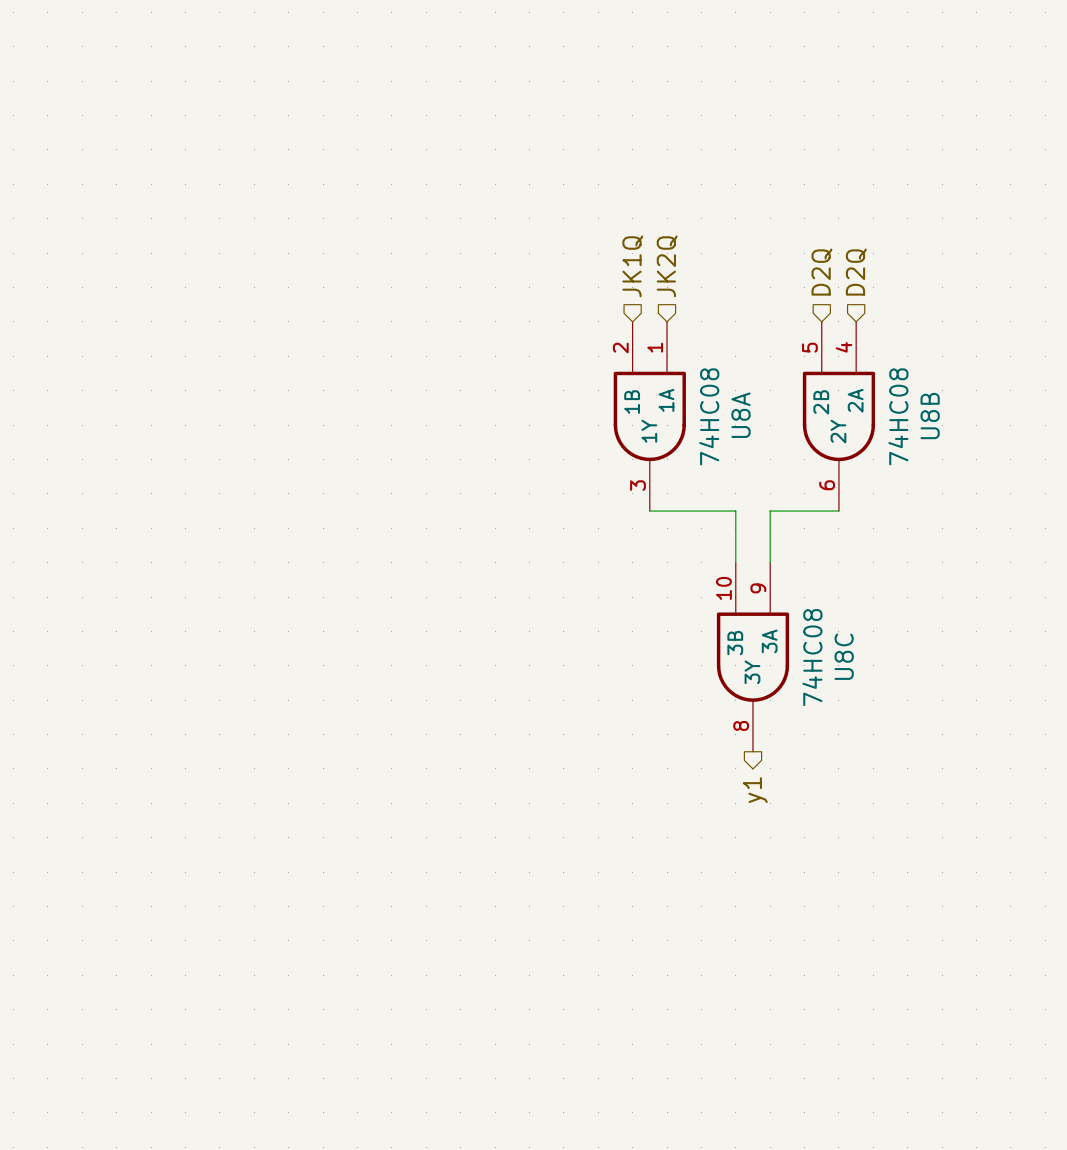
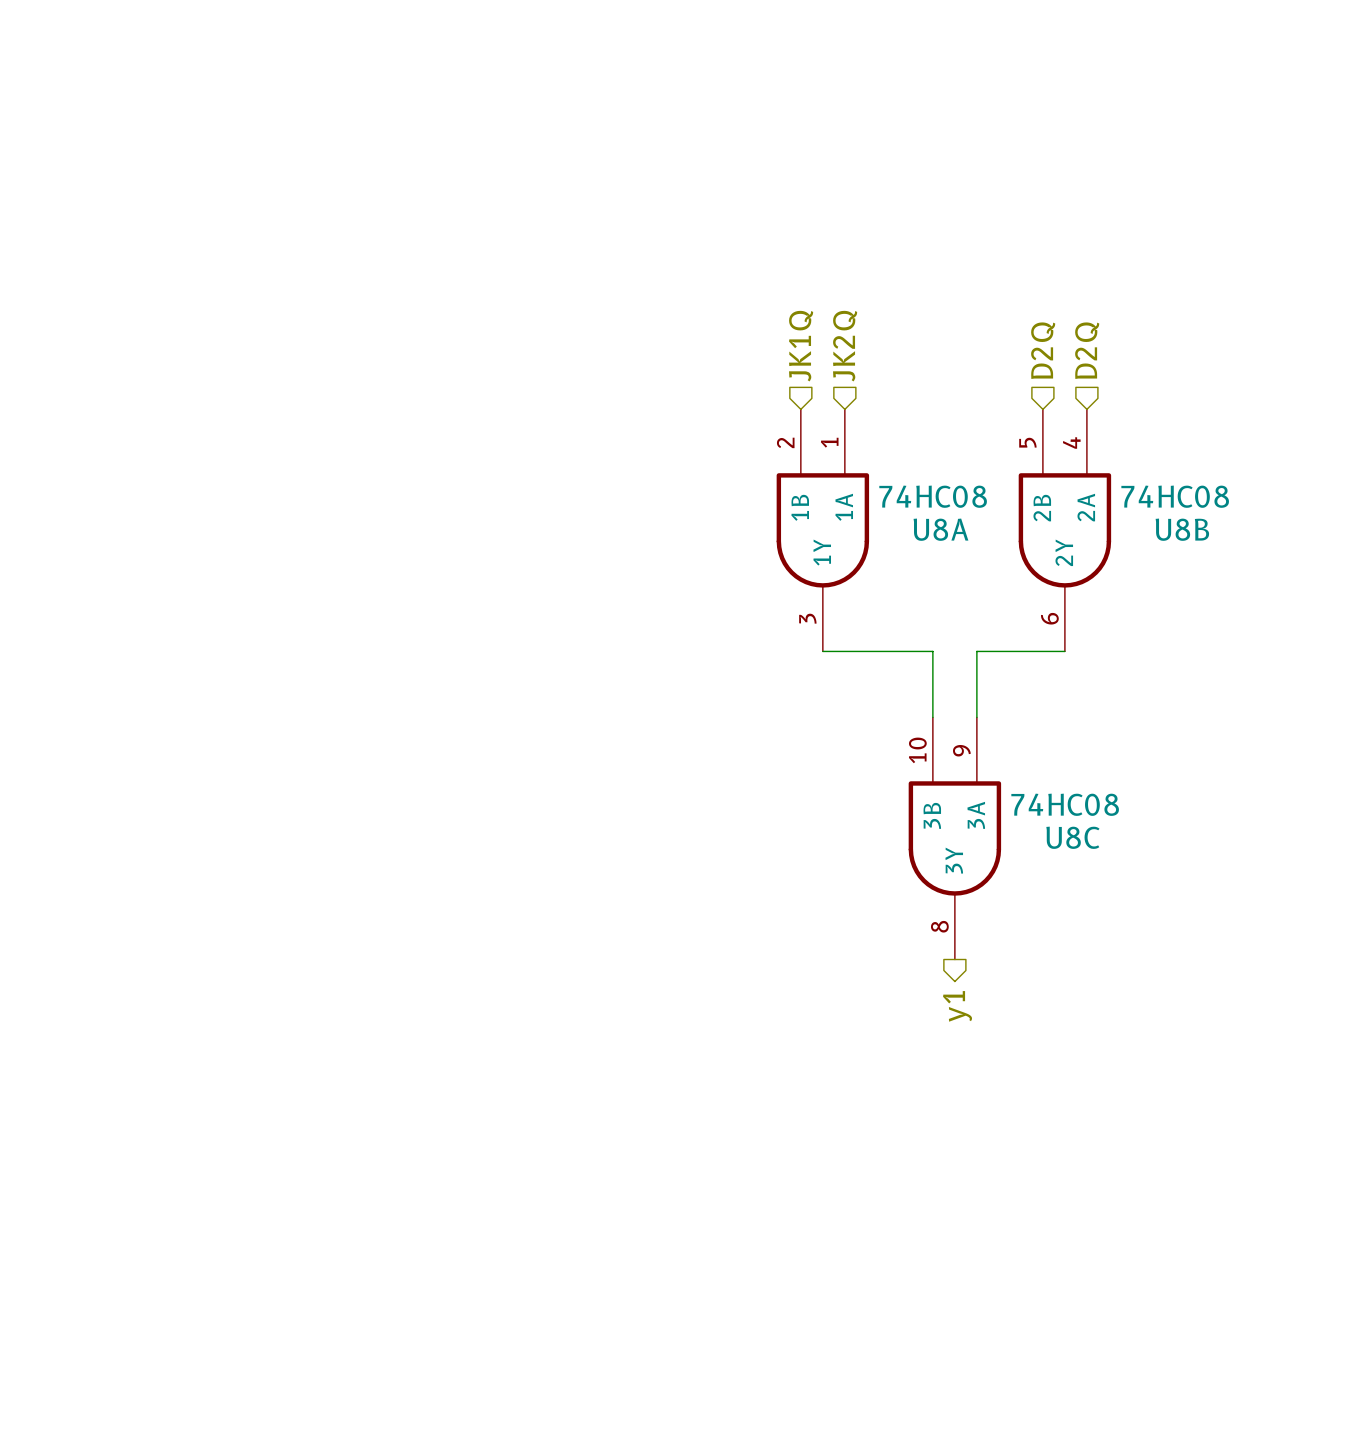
U8A name rotation: 0° (740, 415) -> 90° clockwise (940, 529)
U8A value rotation: 0° (709, 416) -> 90° clockwise (933, 496)
U8B value rotation: 0° (898, 416) -> 90° clockwise (1175, 496)
U8B name rotation: 0° (930, 416) -> 90° clockwise (1182, 529)
U8C name rotation: 0° (844, 656) -> 90° clockwise (1072, 837)
U8C value rotation: 0° (812, 657) -> 90° clockwise (1065, 804)

